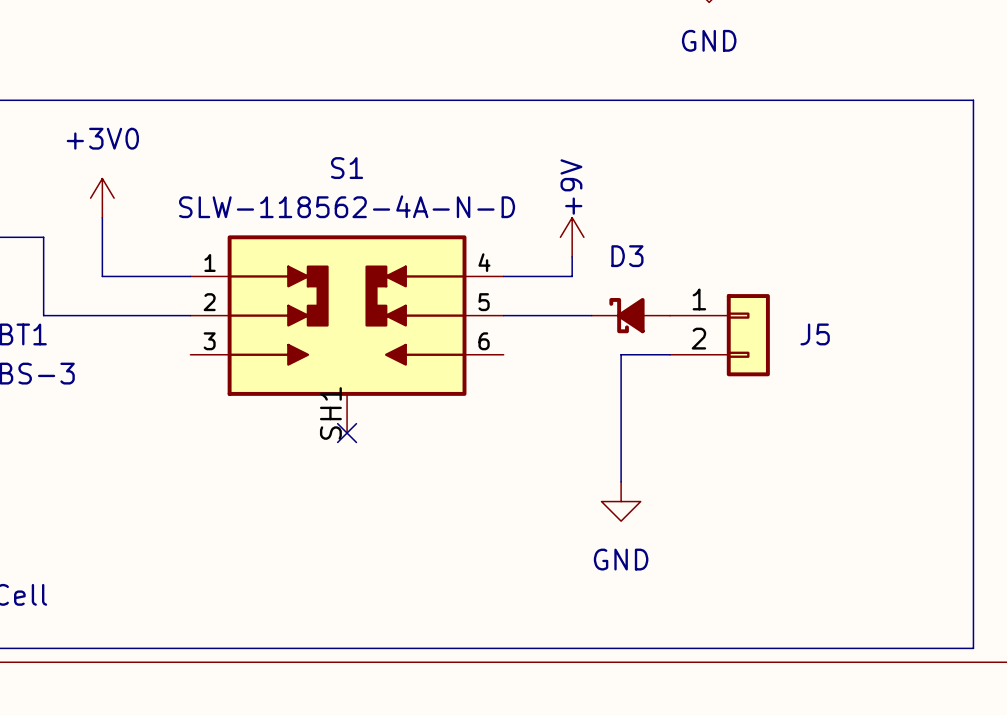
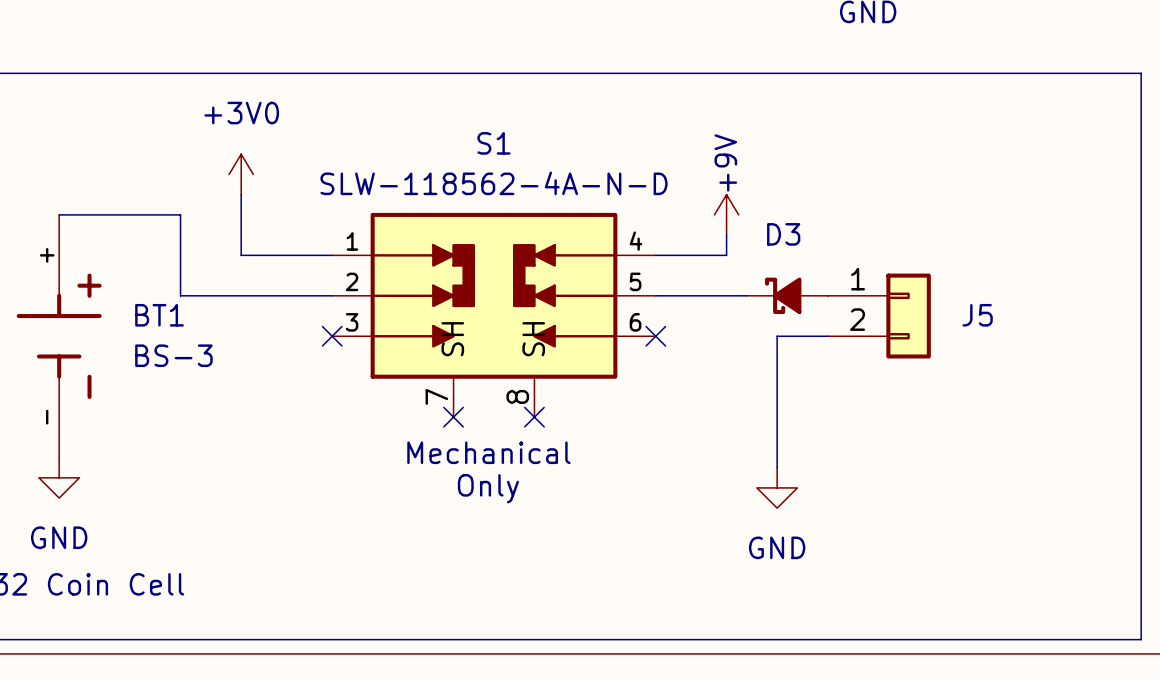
S1 symbol: [190, 235, 504, 434] -> [332, 212, 656, 418]
no-connect mark: none -> (332, 336)
no-connect mark: none -> (655, 336)
no-connect mark: none -> (453, 417)
no-connect mark: (347, 433) -> none
no-connect mark: none -> (534, 417)
text: none -> Mechanical (488, 452)
text: none -> Only (488, 488)

